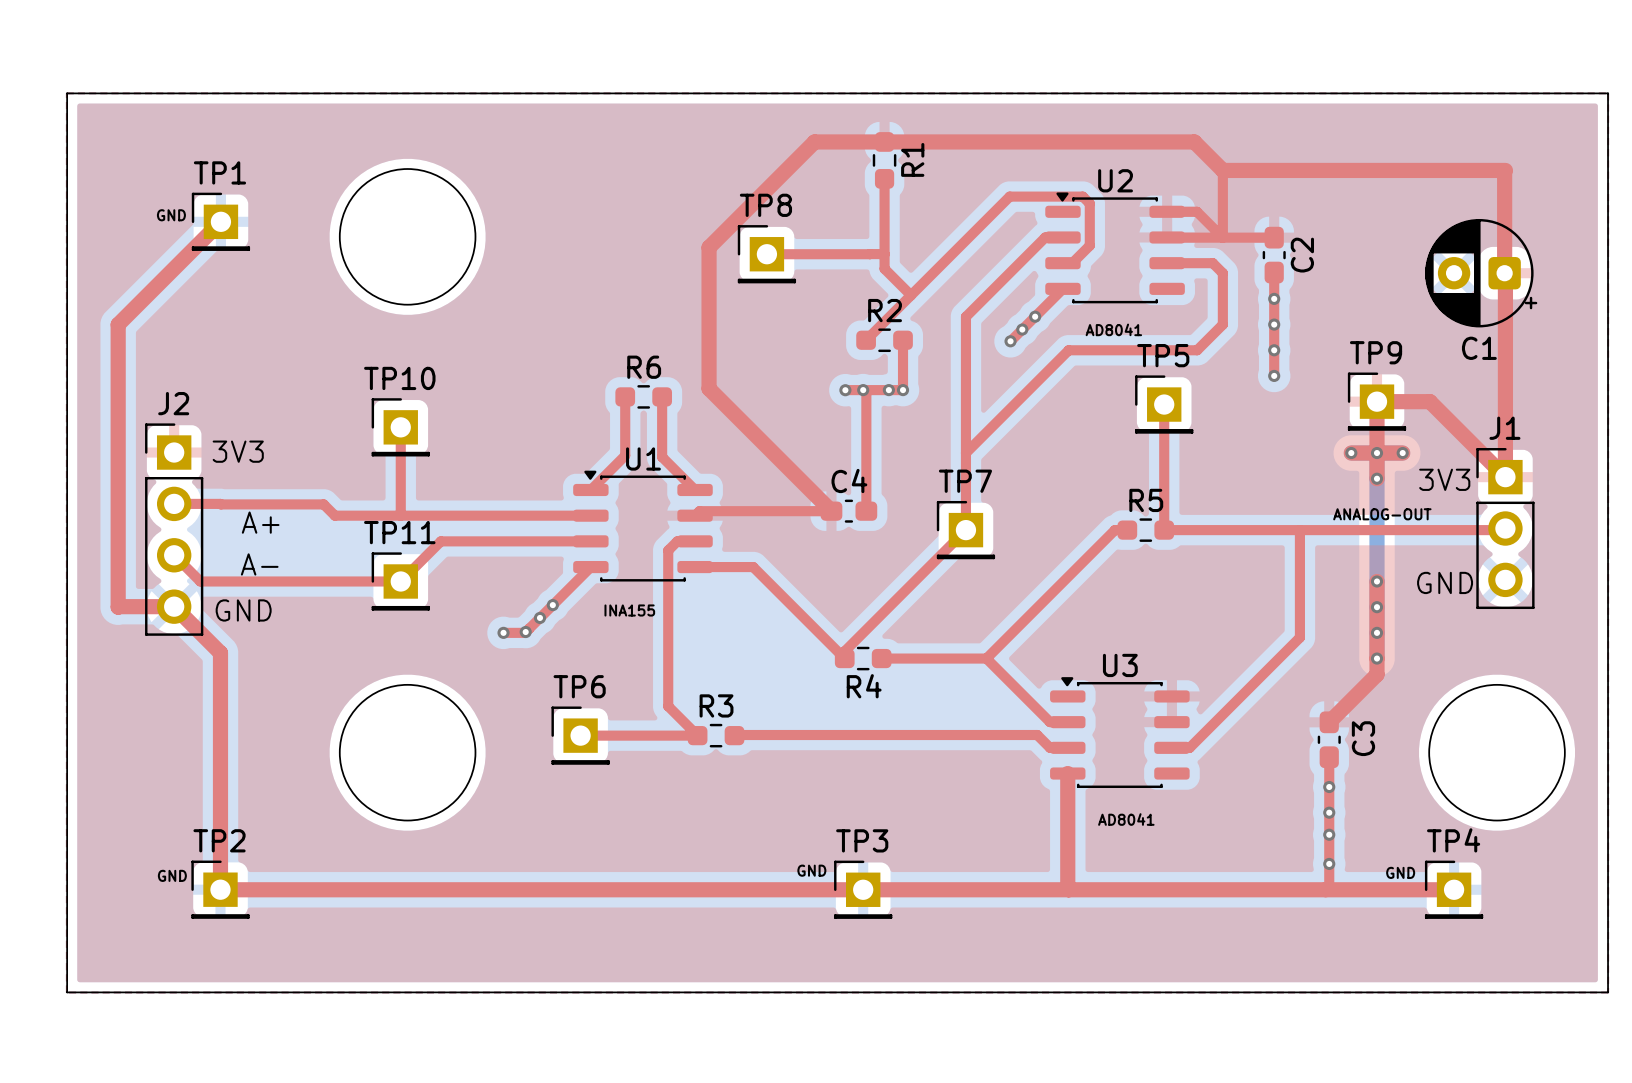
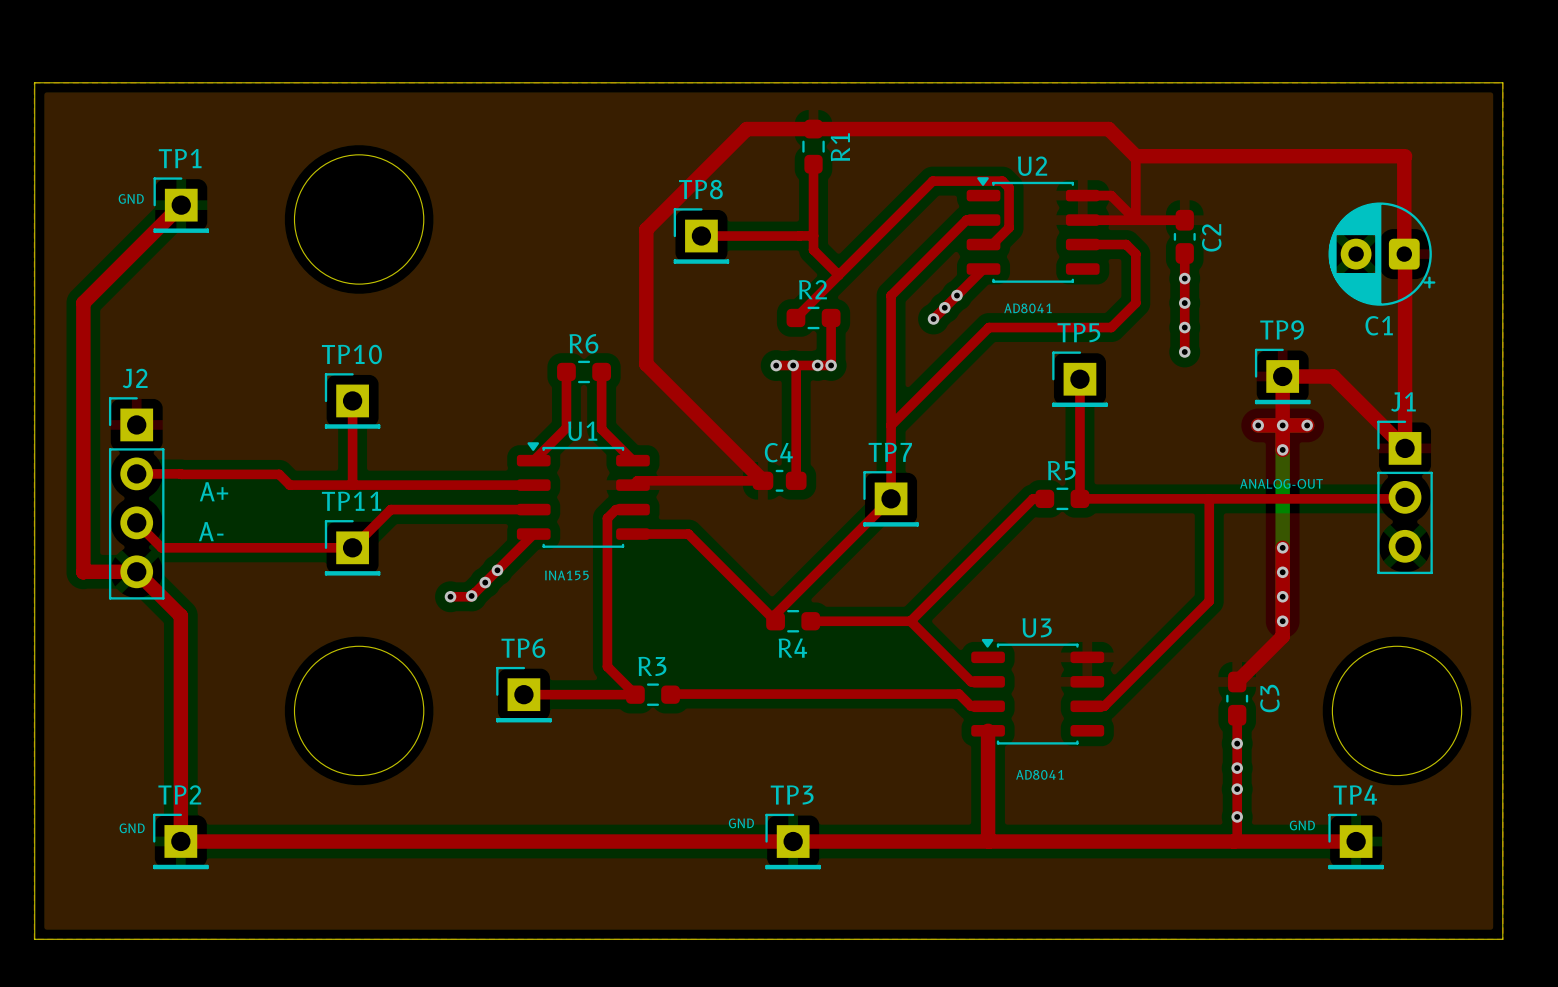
text: 3V3 (238, 451) -> none
text: 3V3 (1444, 479) -> none
text: GND (1445, 582) -> none
text: GND (243, 610) -> none

